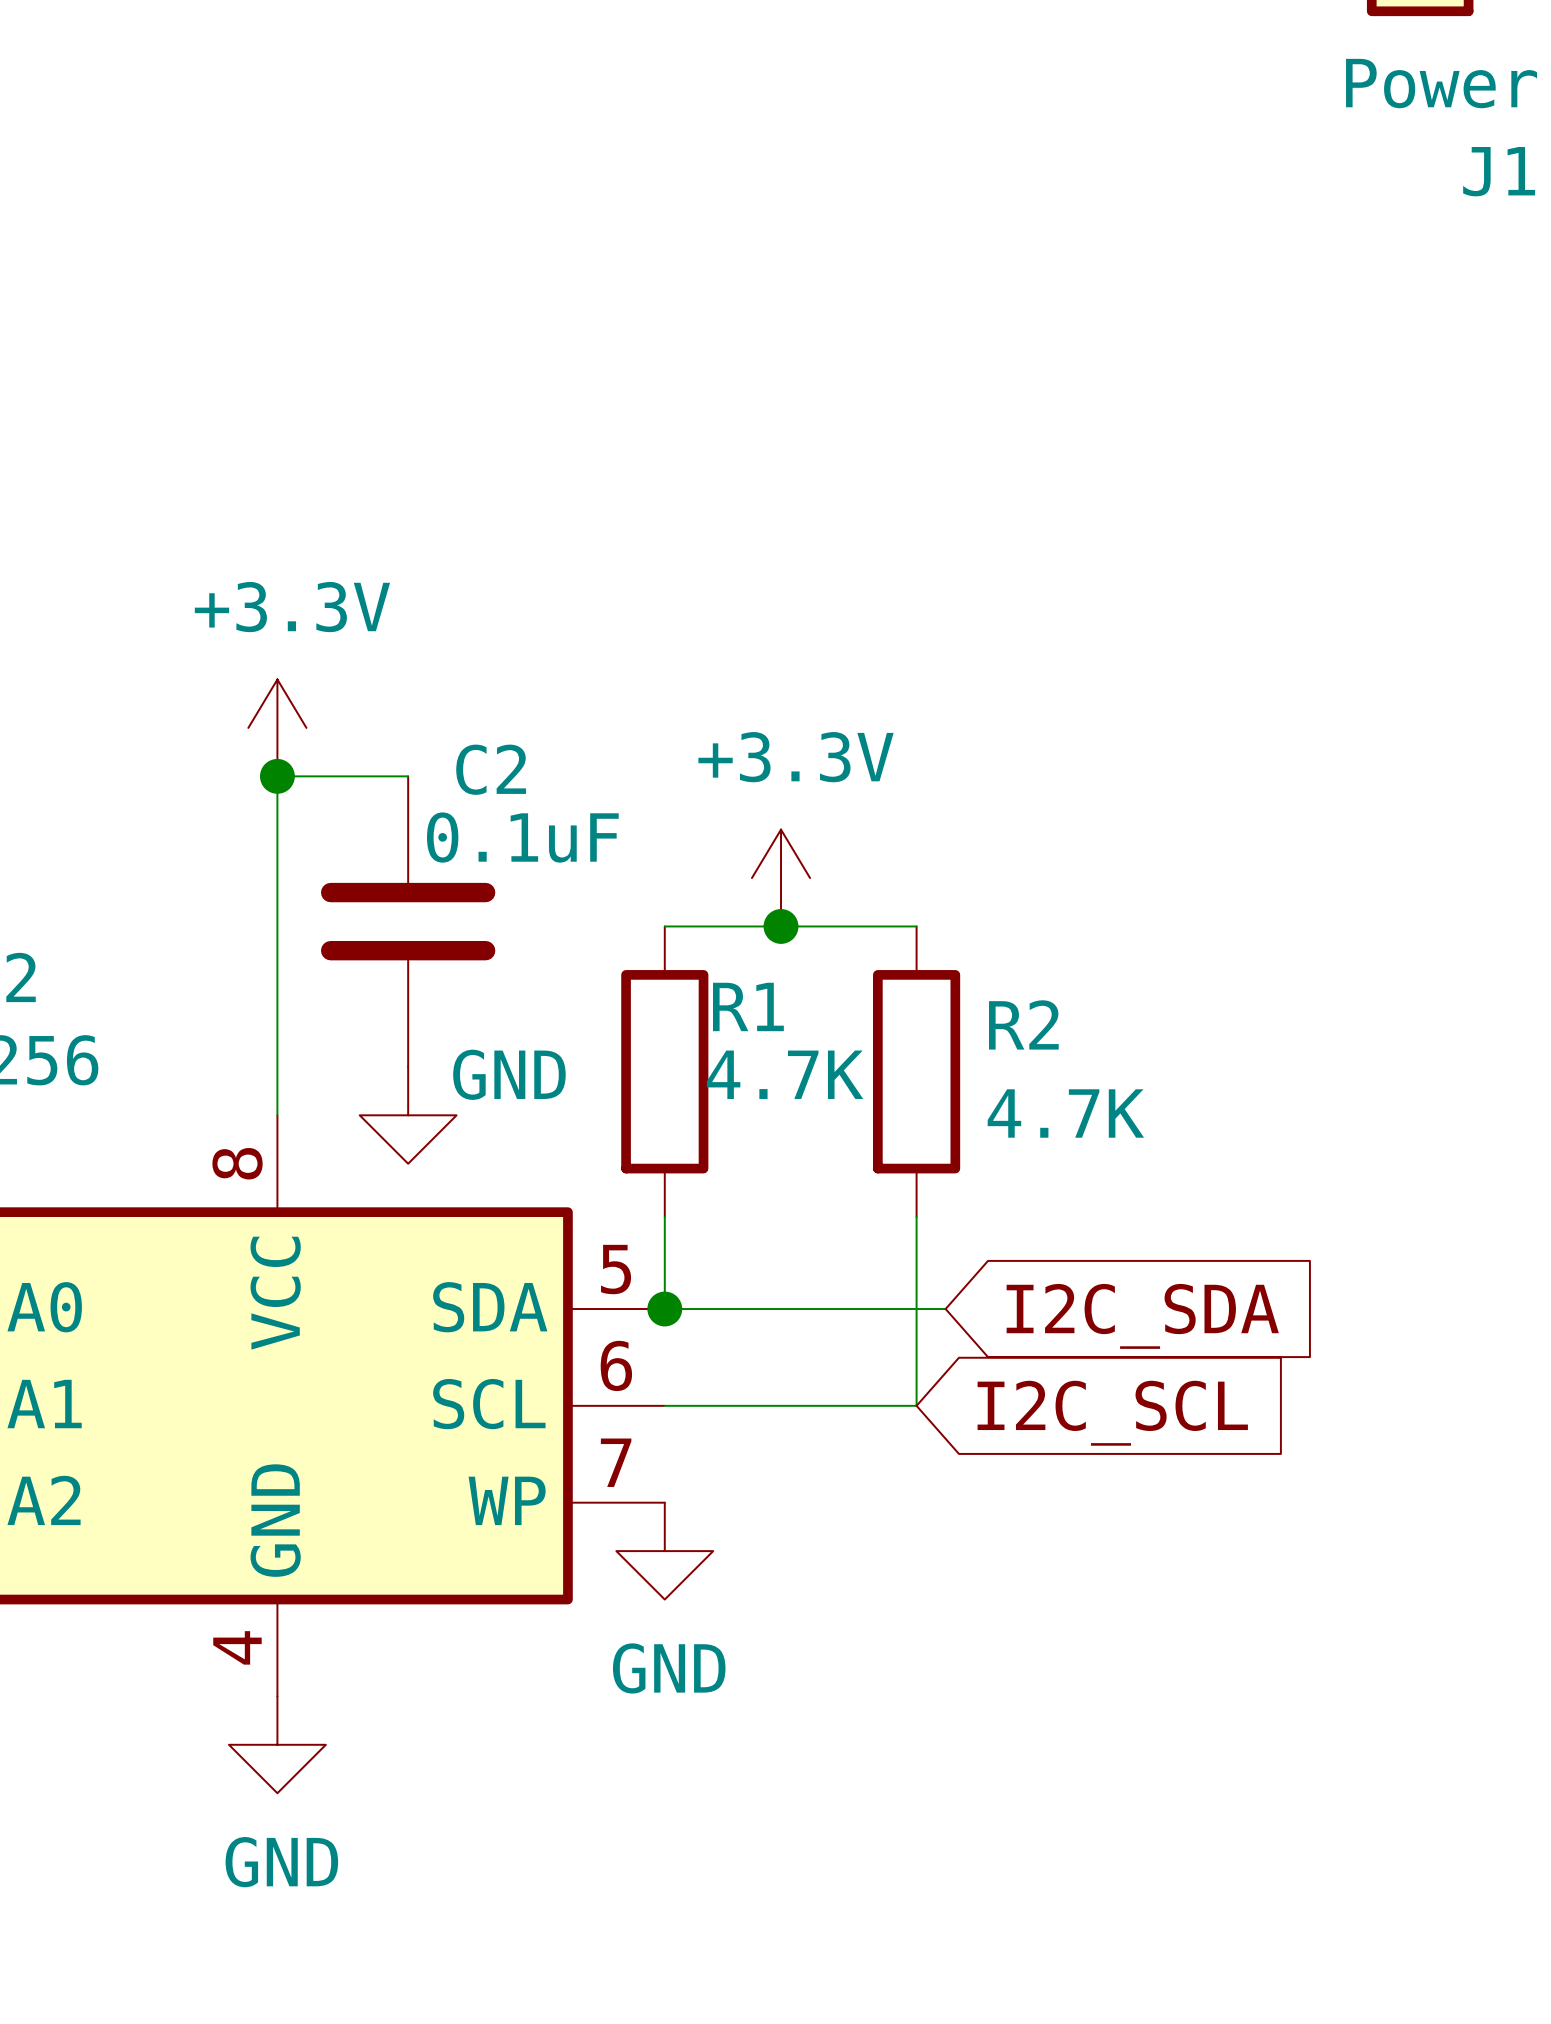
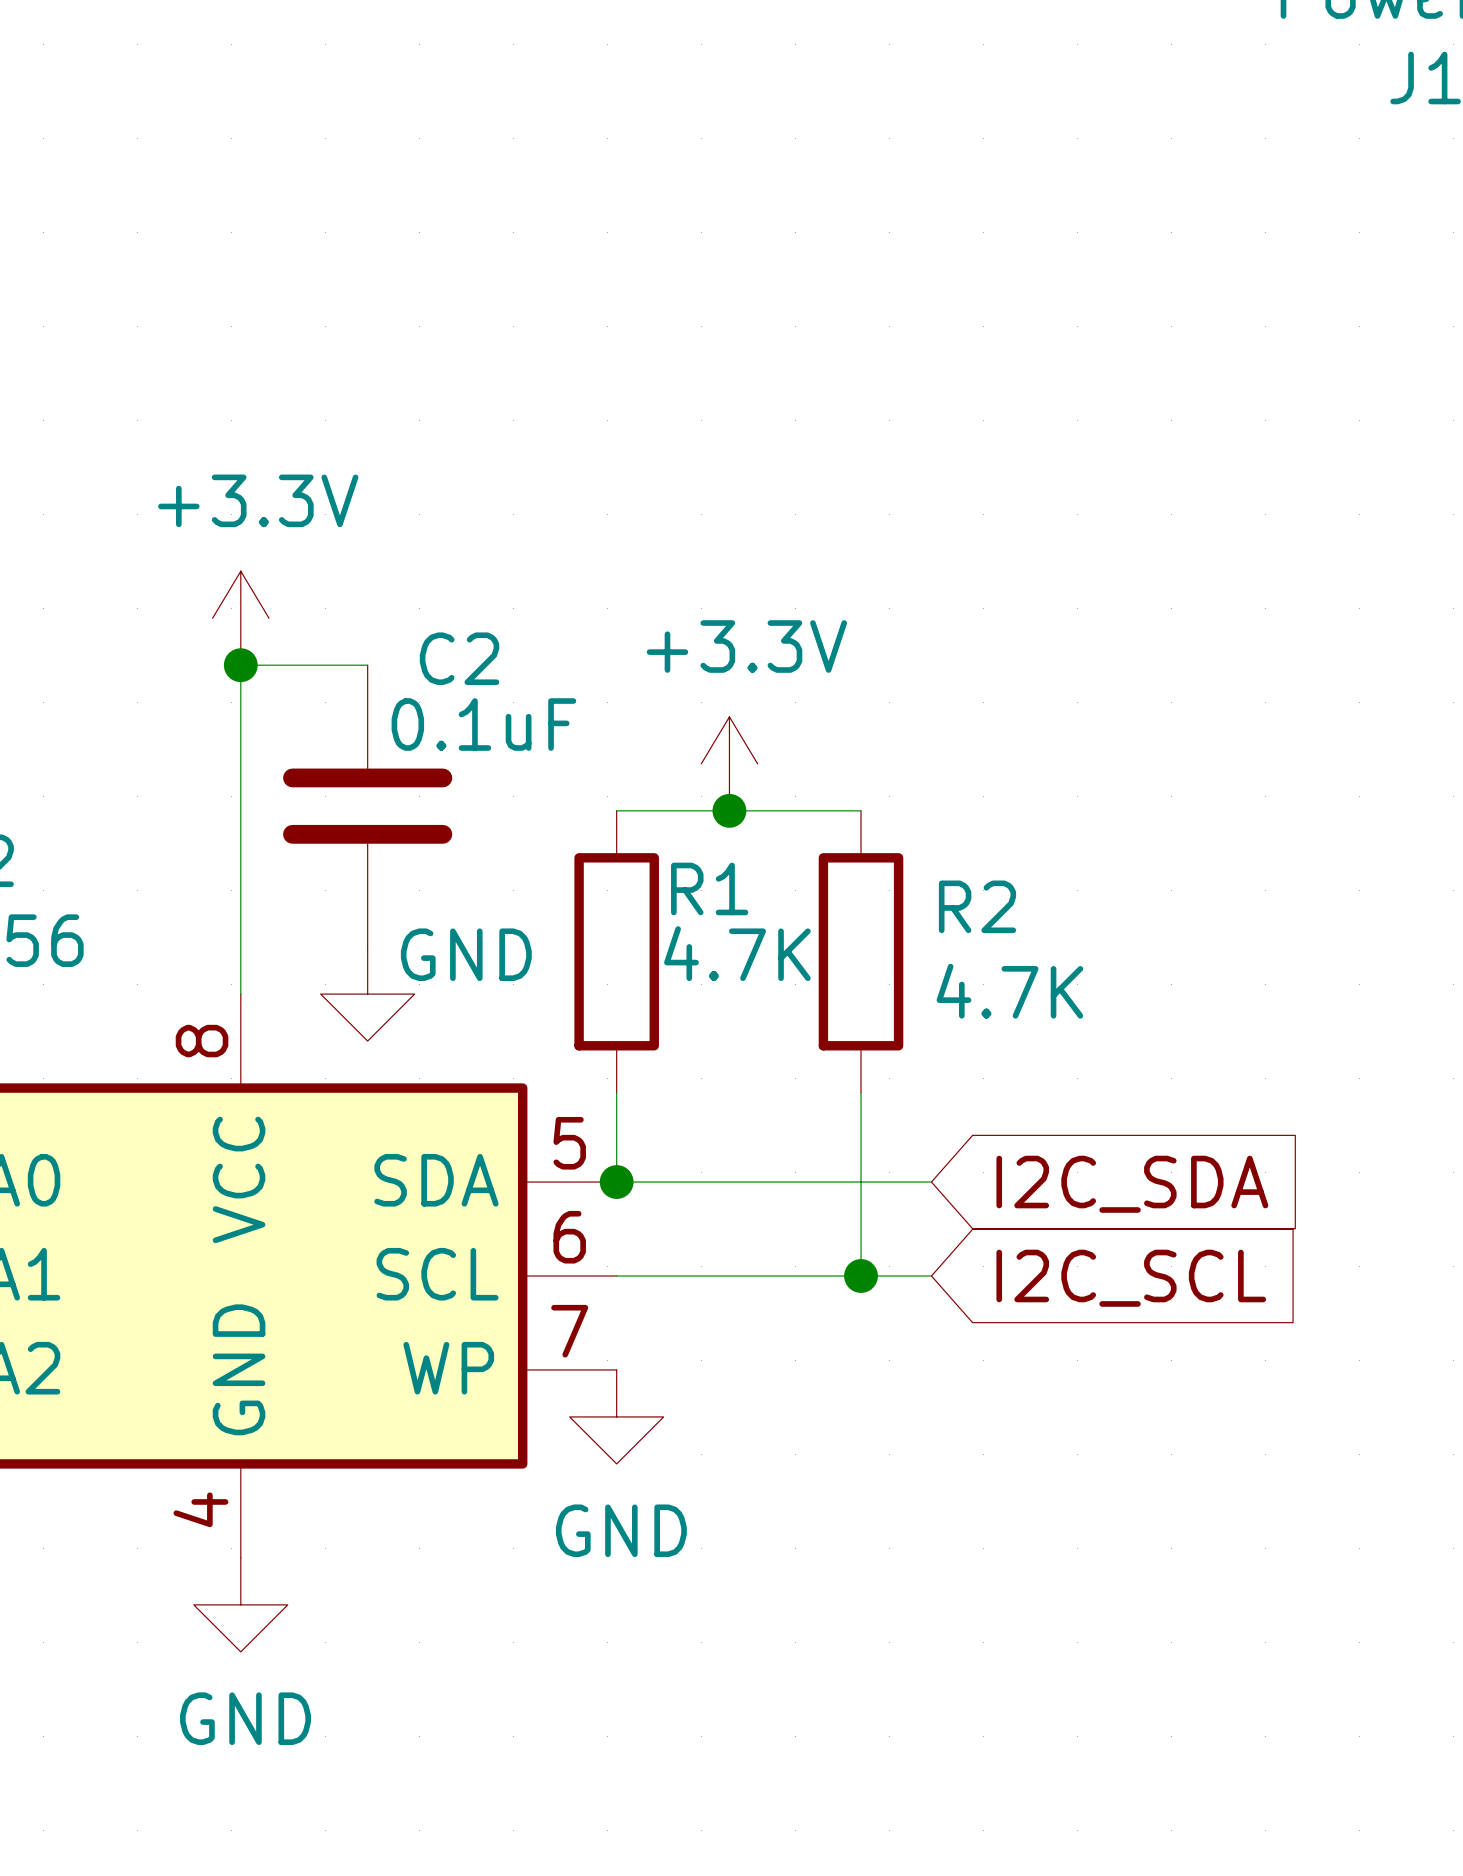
wire: none -> (889, 1182) (931, 1182)
global label position: I2C_SDA (1142, 1316) -> I2C_SDA (1132, 1184)
wire: none -> (861, 1275) (931, 1275)
junction: none -> (861, 1275)
global label position: I2C_SCL (1112, 1413) -> I2C_SCL (1131, 1278)

